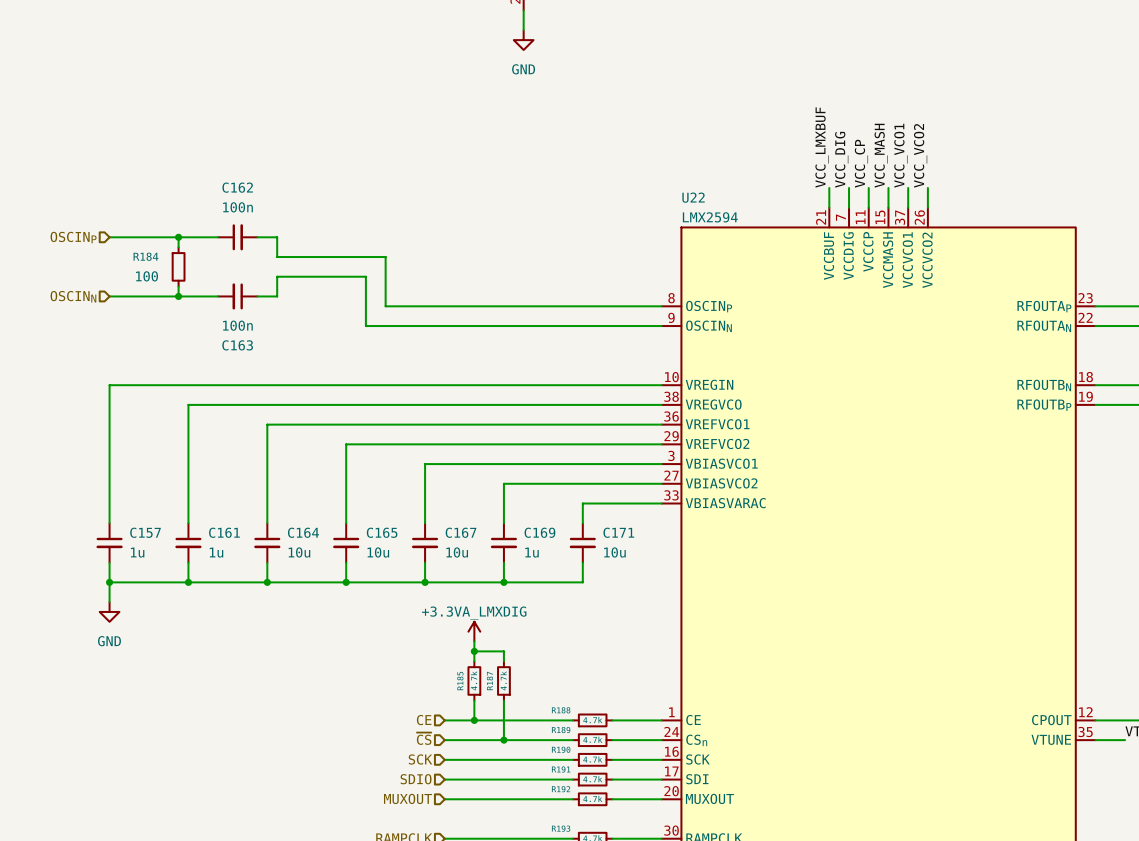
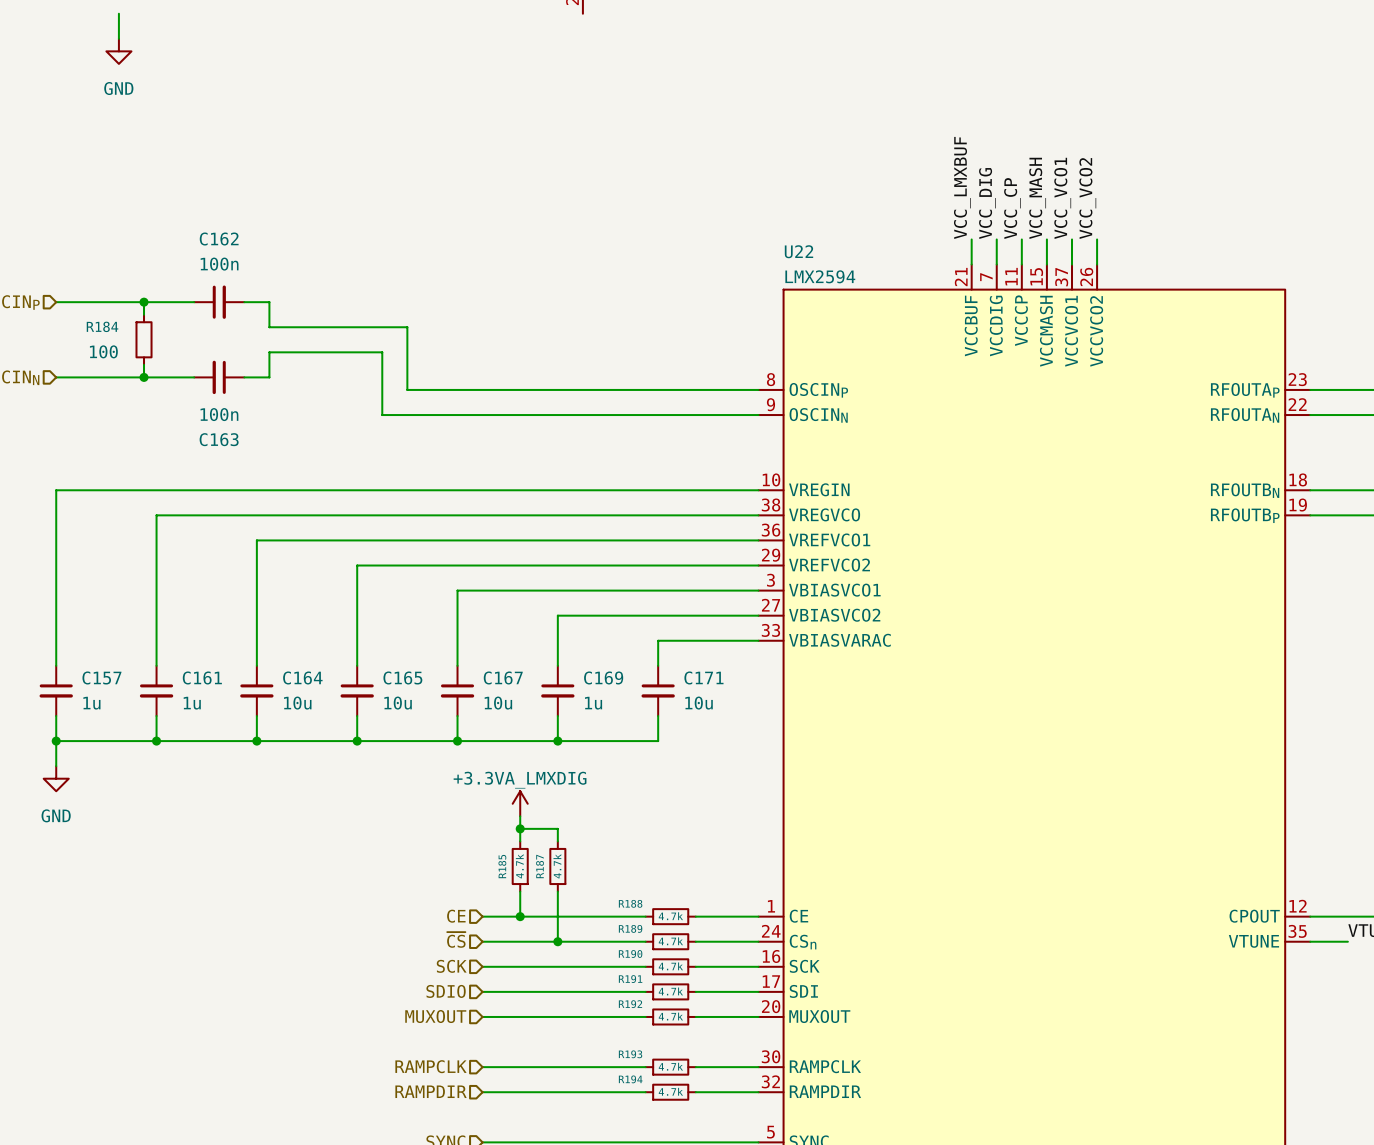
wire: none -> (118, 13) (118, 38)
wire: (523, 10) (523, 30) -> none
power symbol: none -> GND (118, 51)
power symbol: GND (523, 40) -> none

